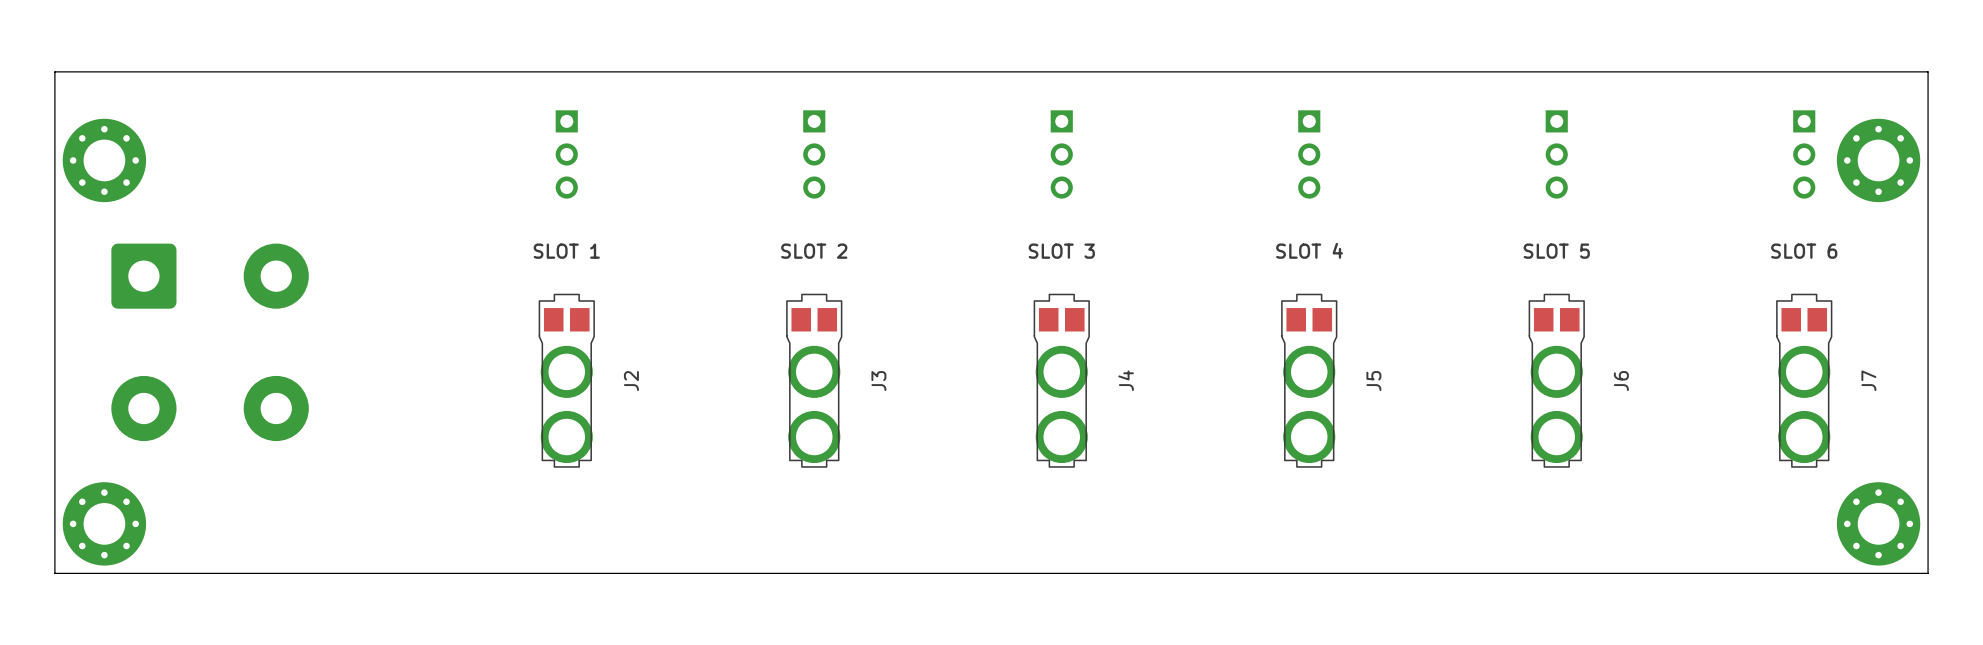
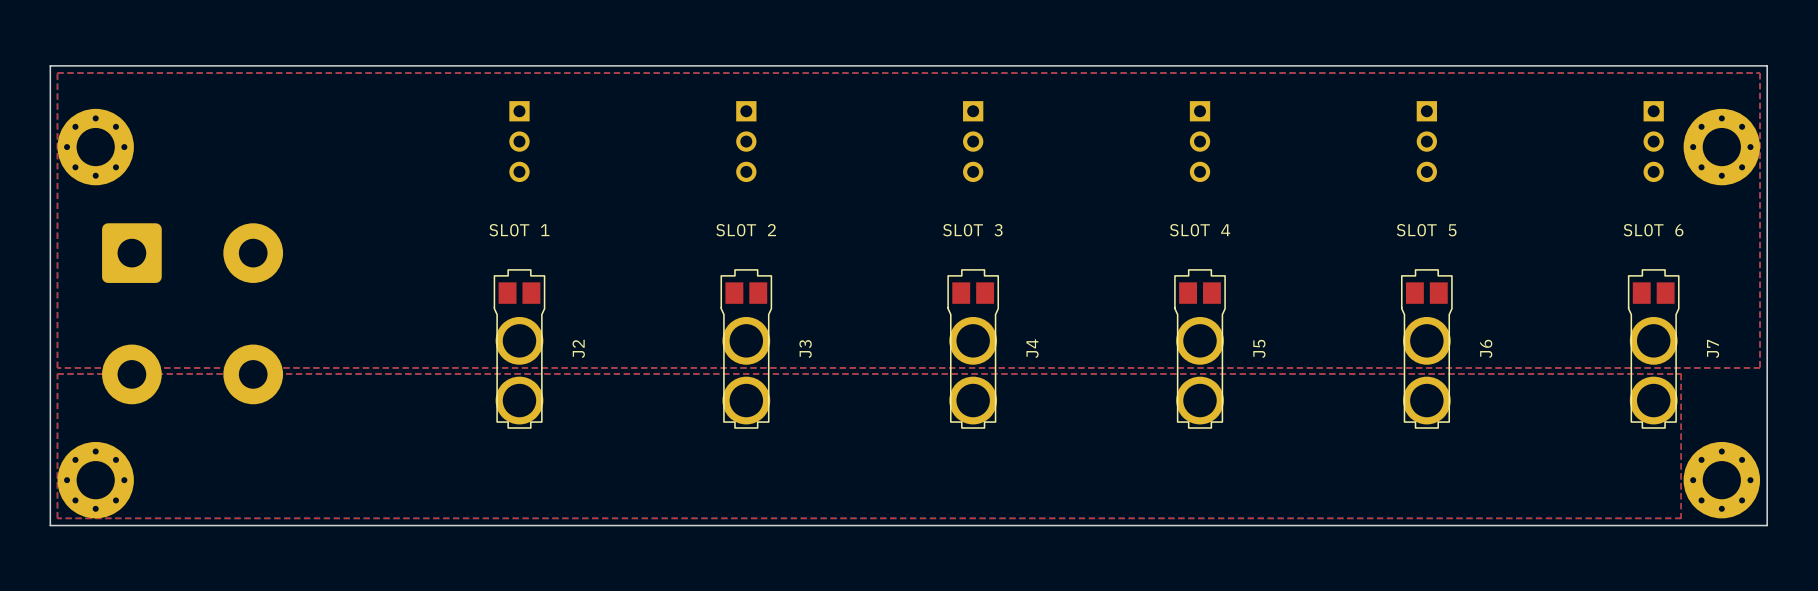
top zone outline: none -> (57, 73) (57, 367) (1760, 367) (1760, 73) (57, 73)
top zone outline: none -> (57, 373) (1681, 373) (1681, 518) (57, 518) (57, 373)

